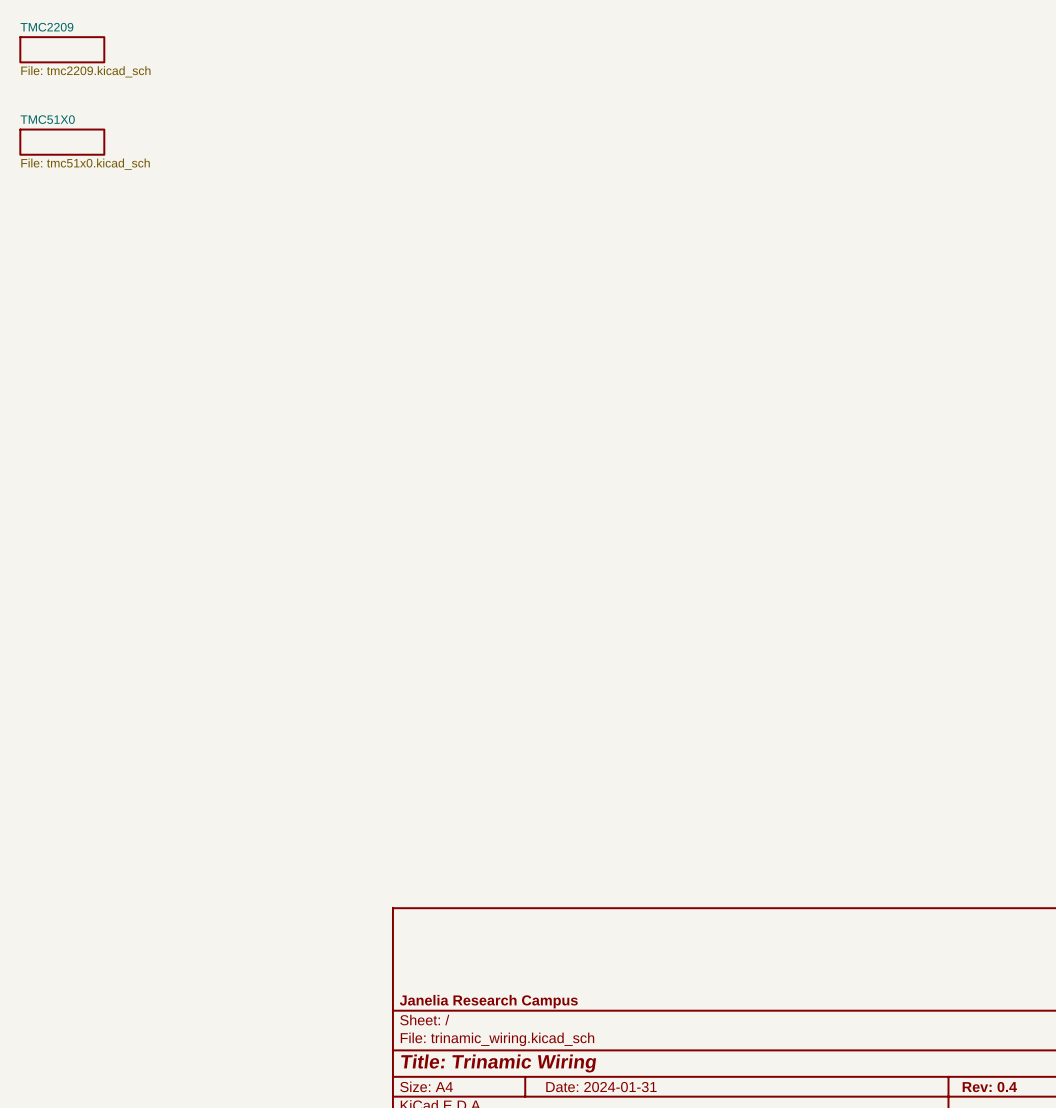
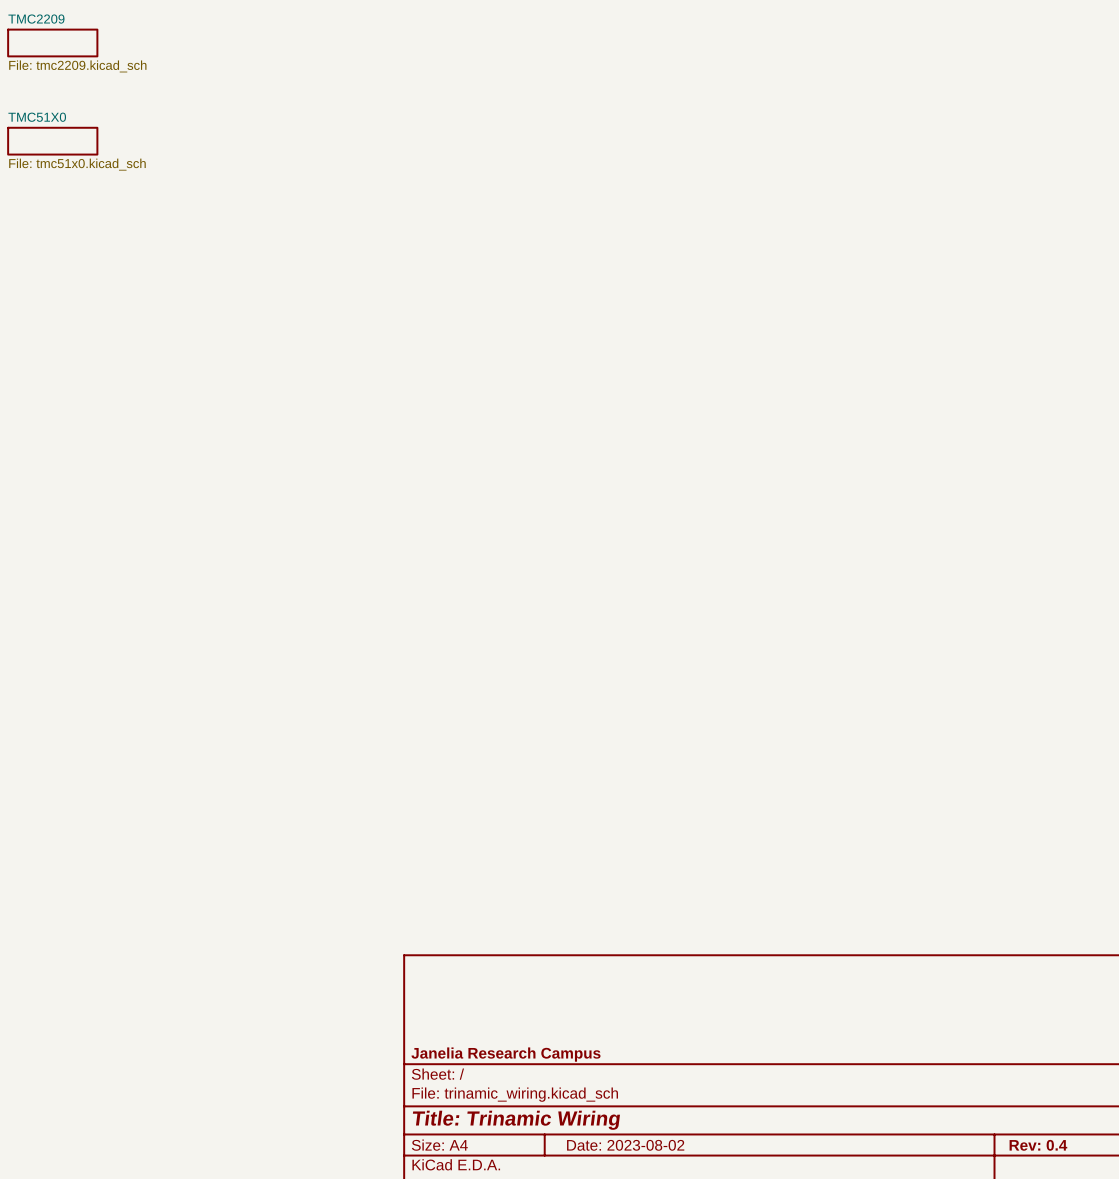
title block: Date: 2024-01-31 (601, 1087) -> Date: 2023-08-02 (625, 1145)

